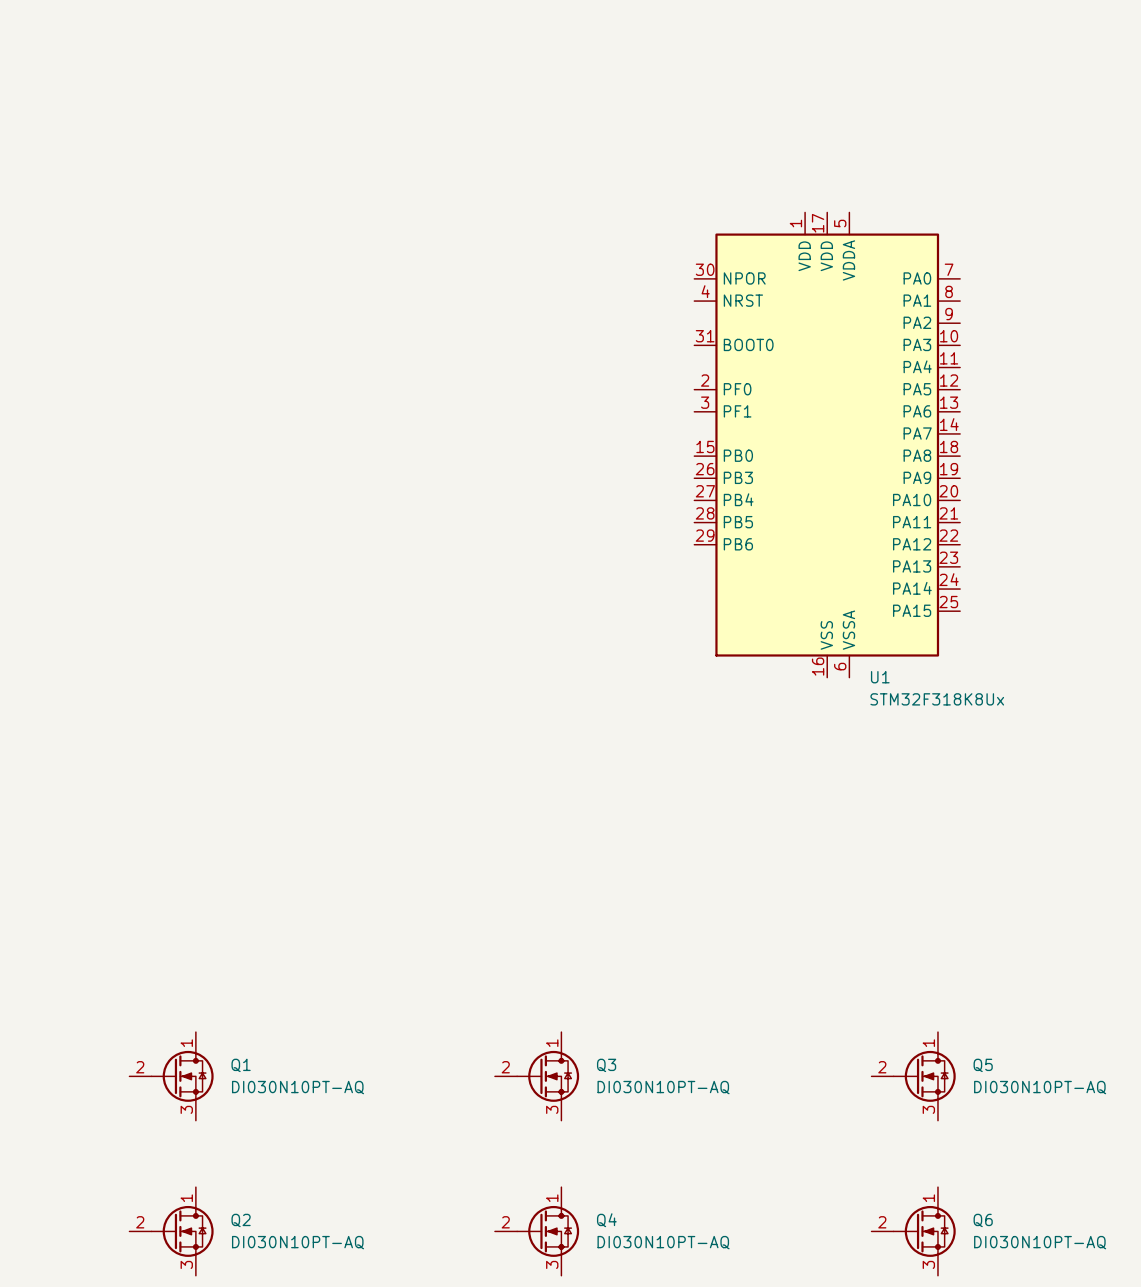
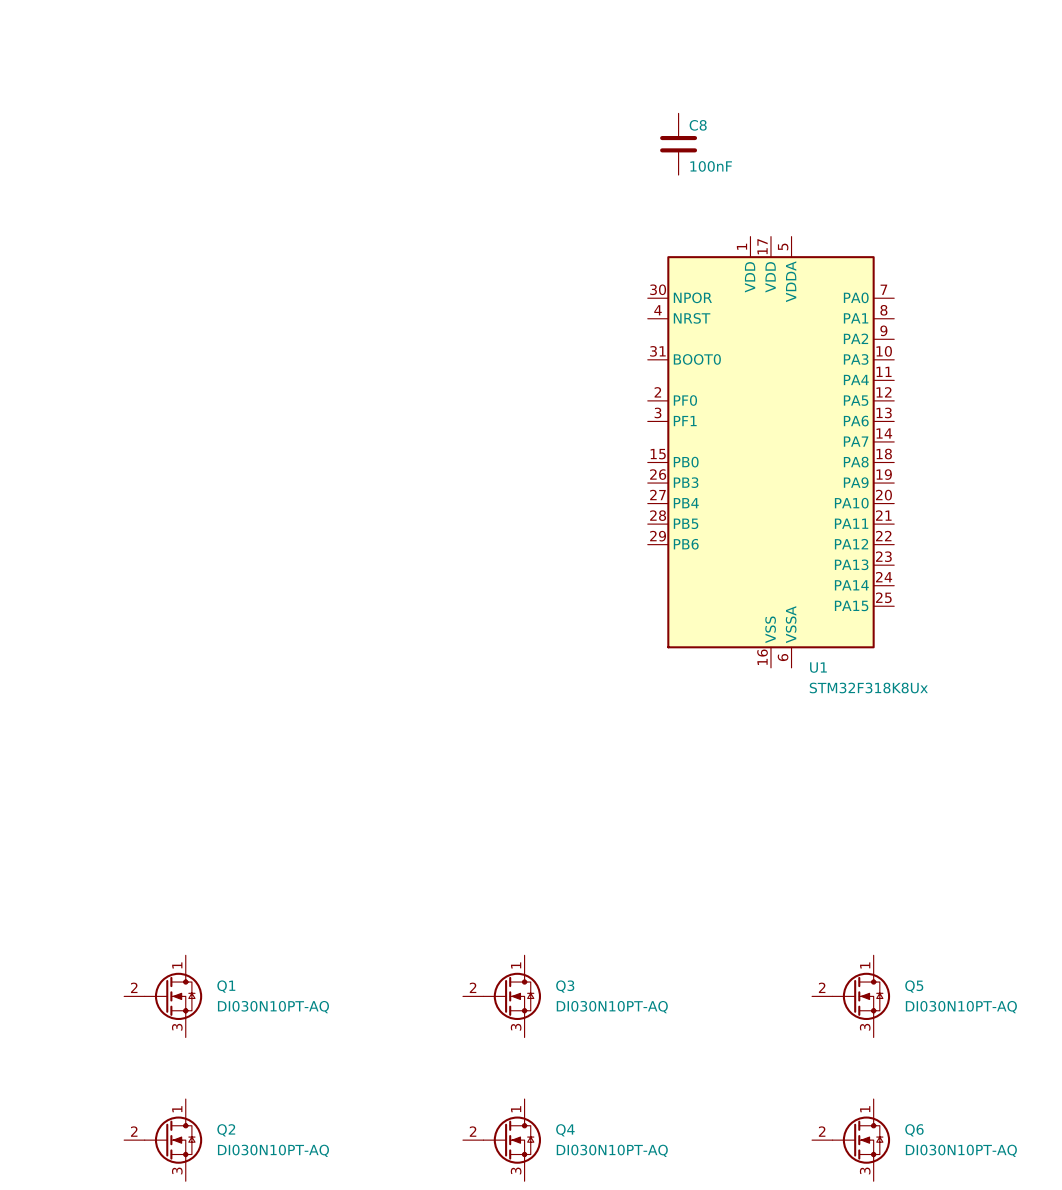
C8: none -> 100nF (678, 144)
U1 position: (827, 445) -> (770, 452)

